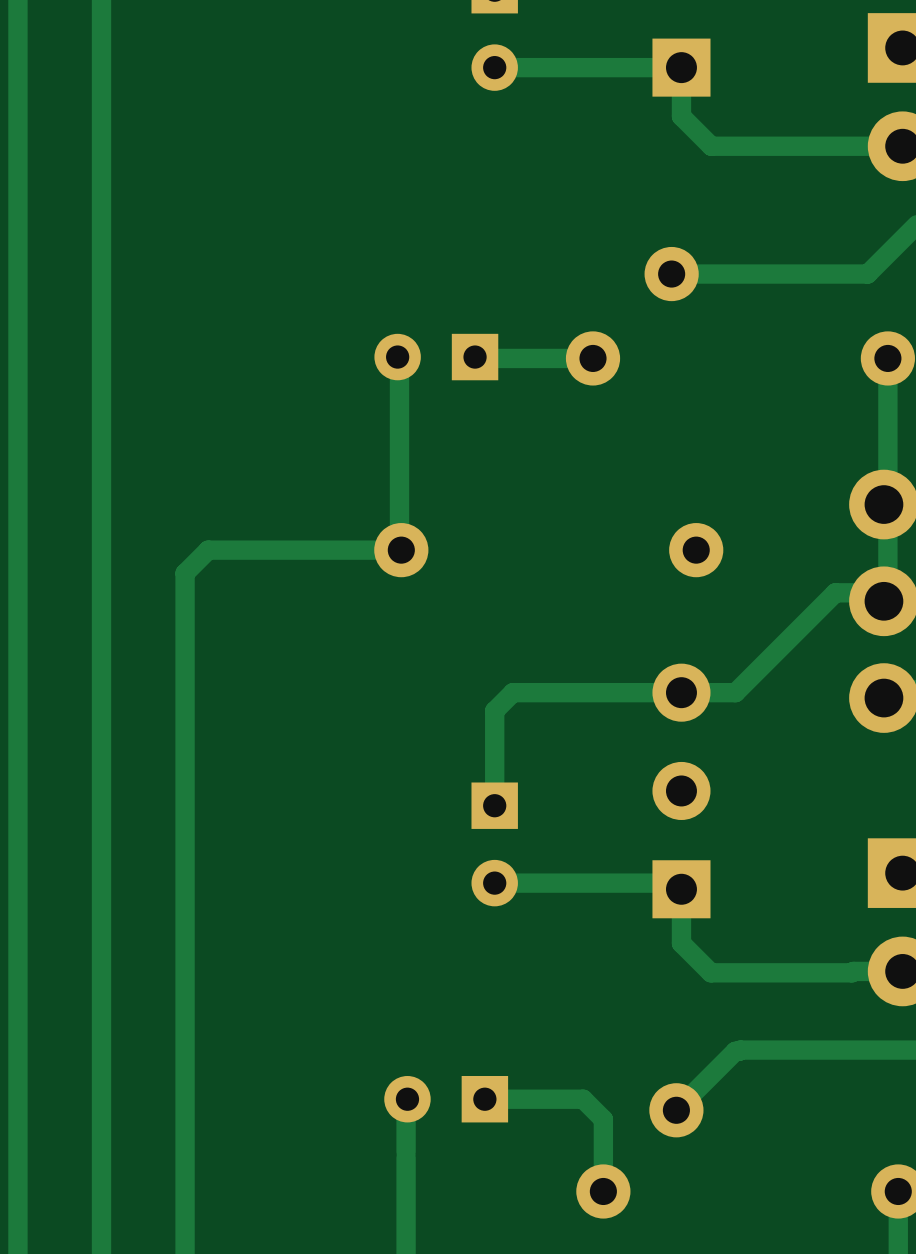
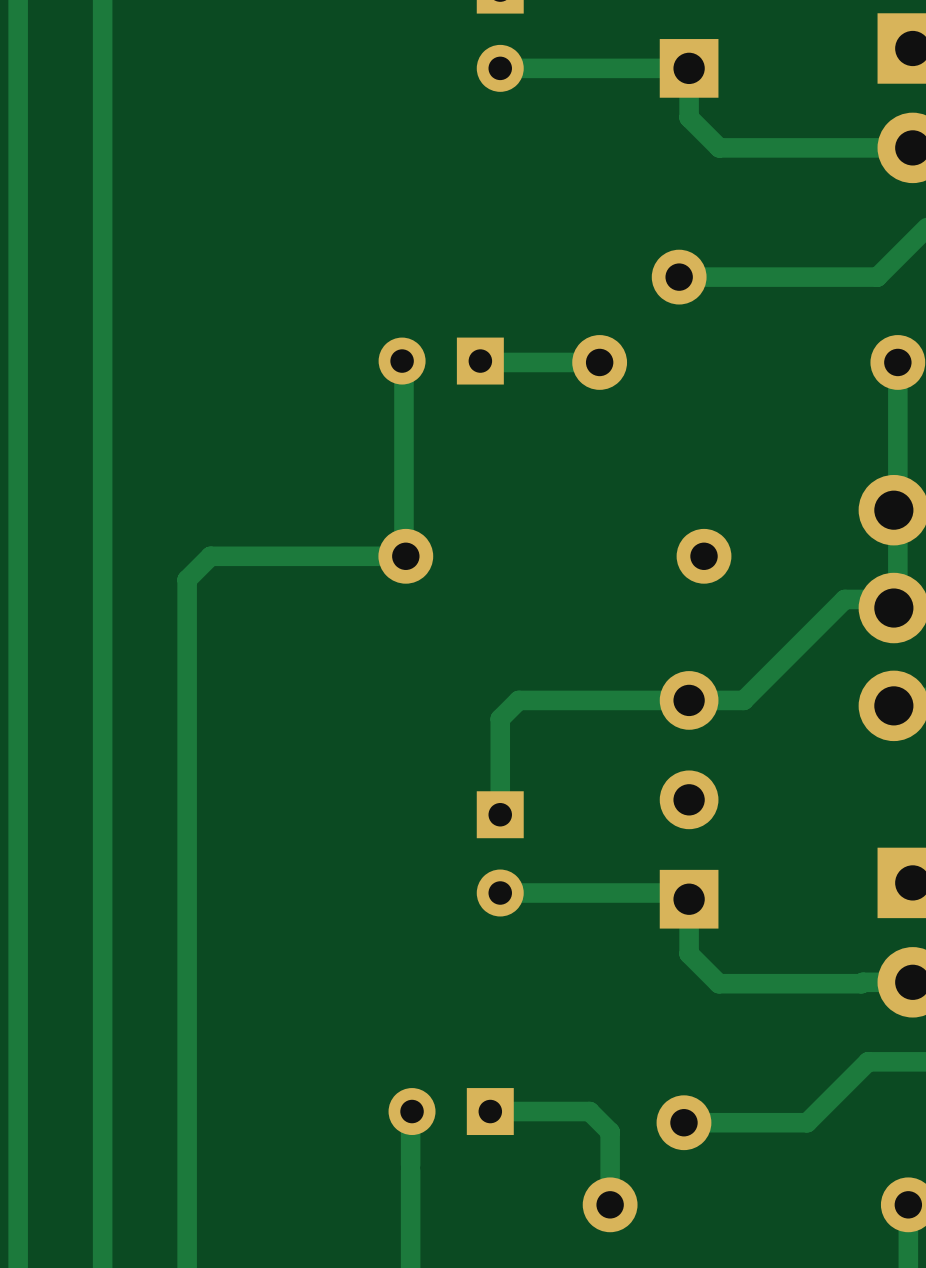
track: (858, 1050) (735, 1051) (676, 1110) -> (868, 1061) (807, 1122) (683, 1122)

